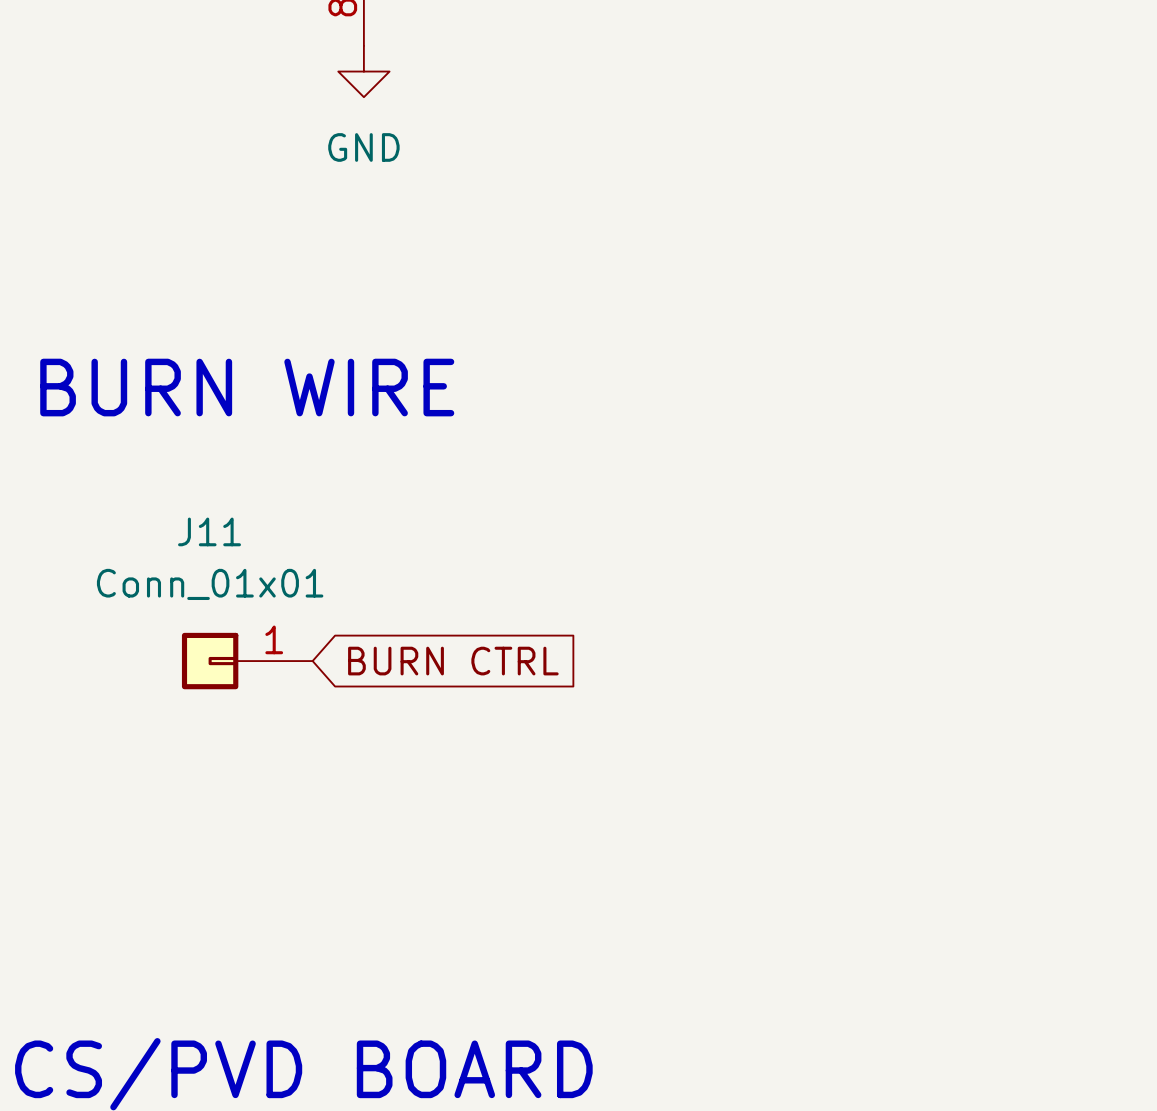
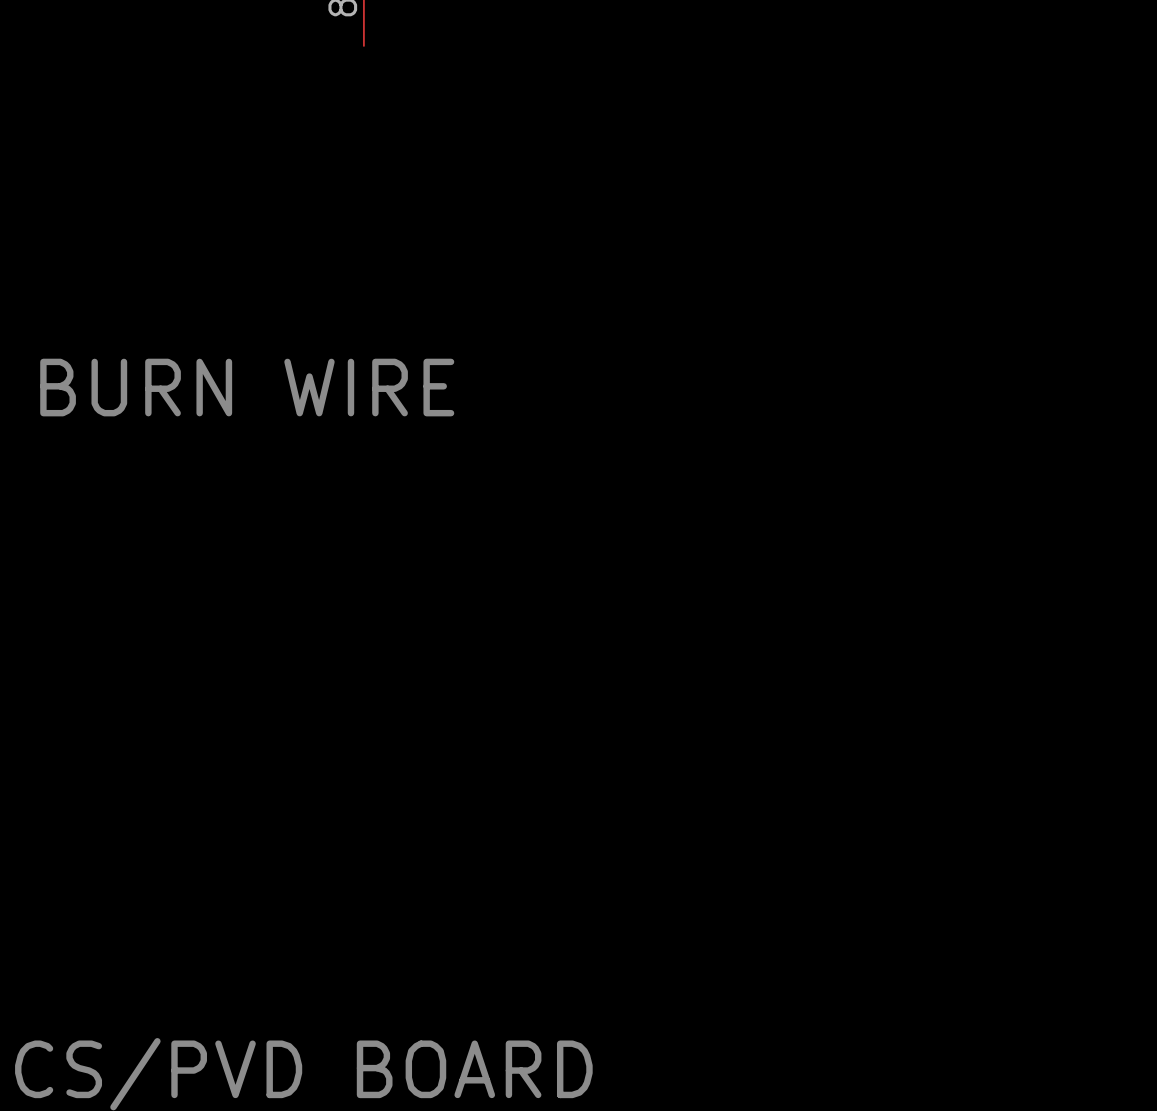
power symbol: GND (363, 71) -> none
J11: Conn_01x01 (247, 661) -> none
global label: BURN CTRL (453, 661) -> none

